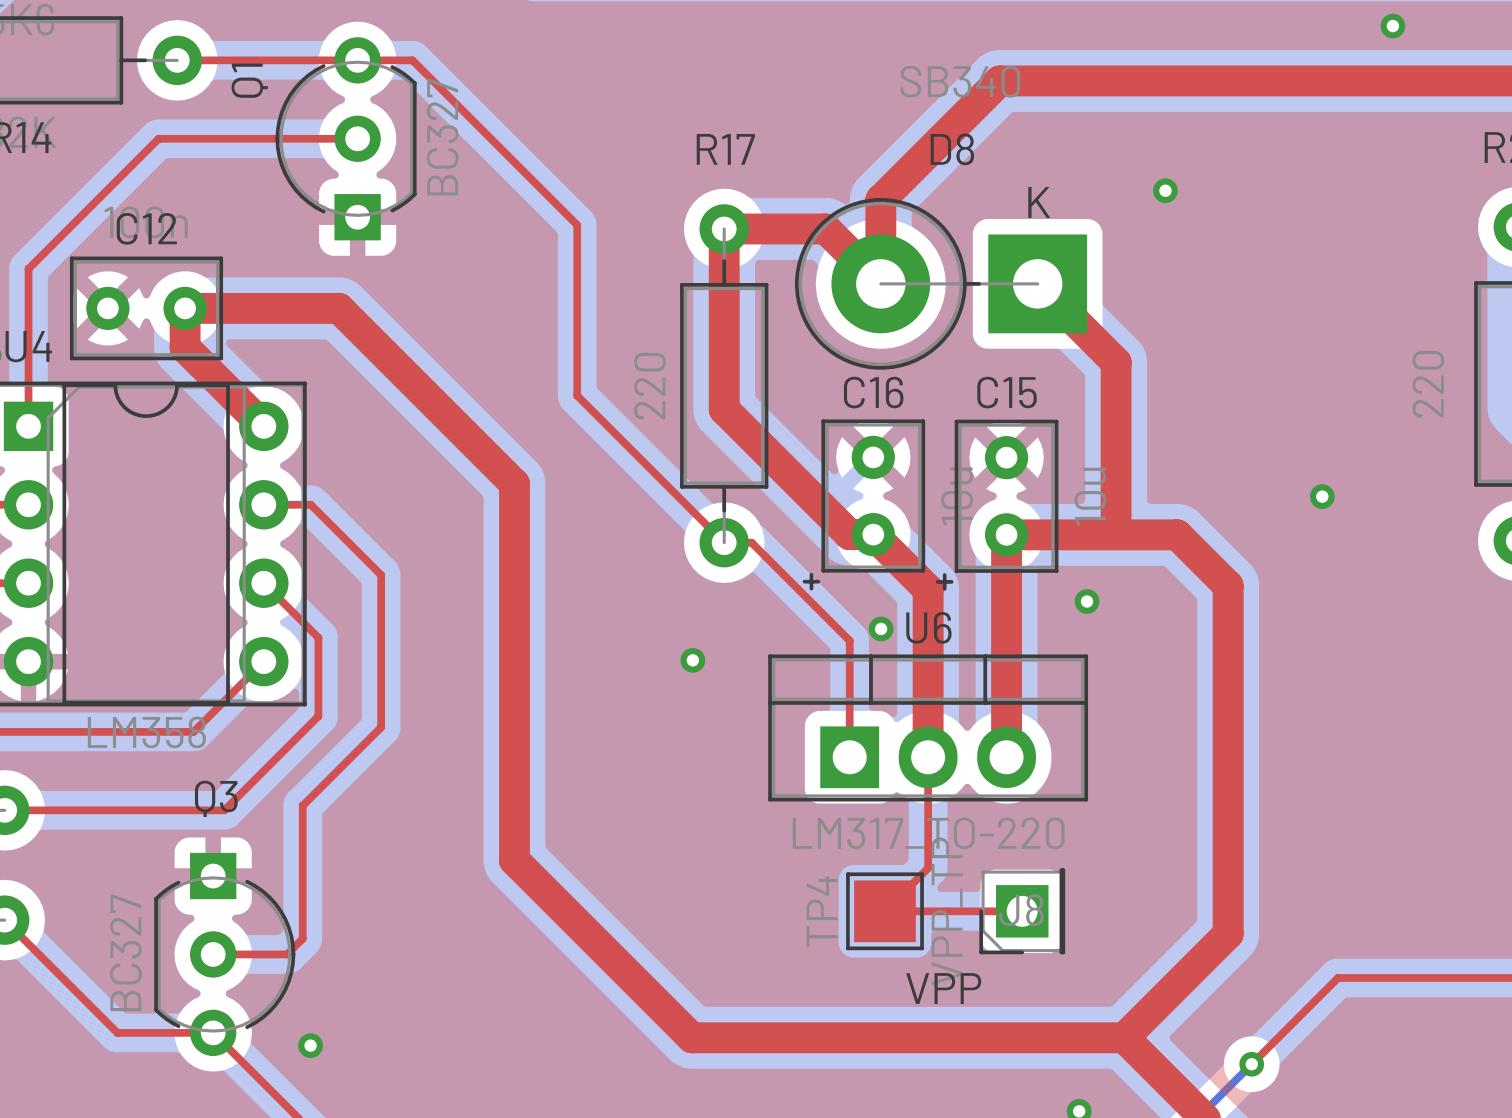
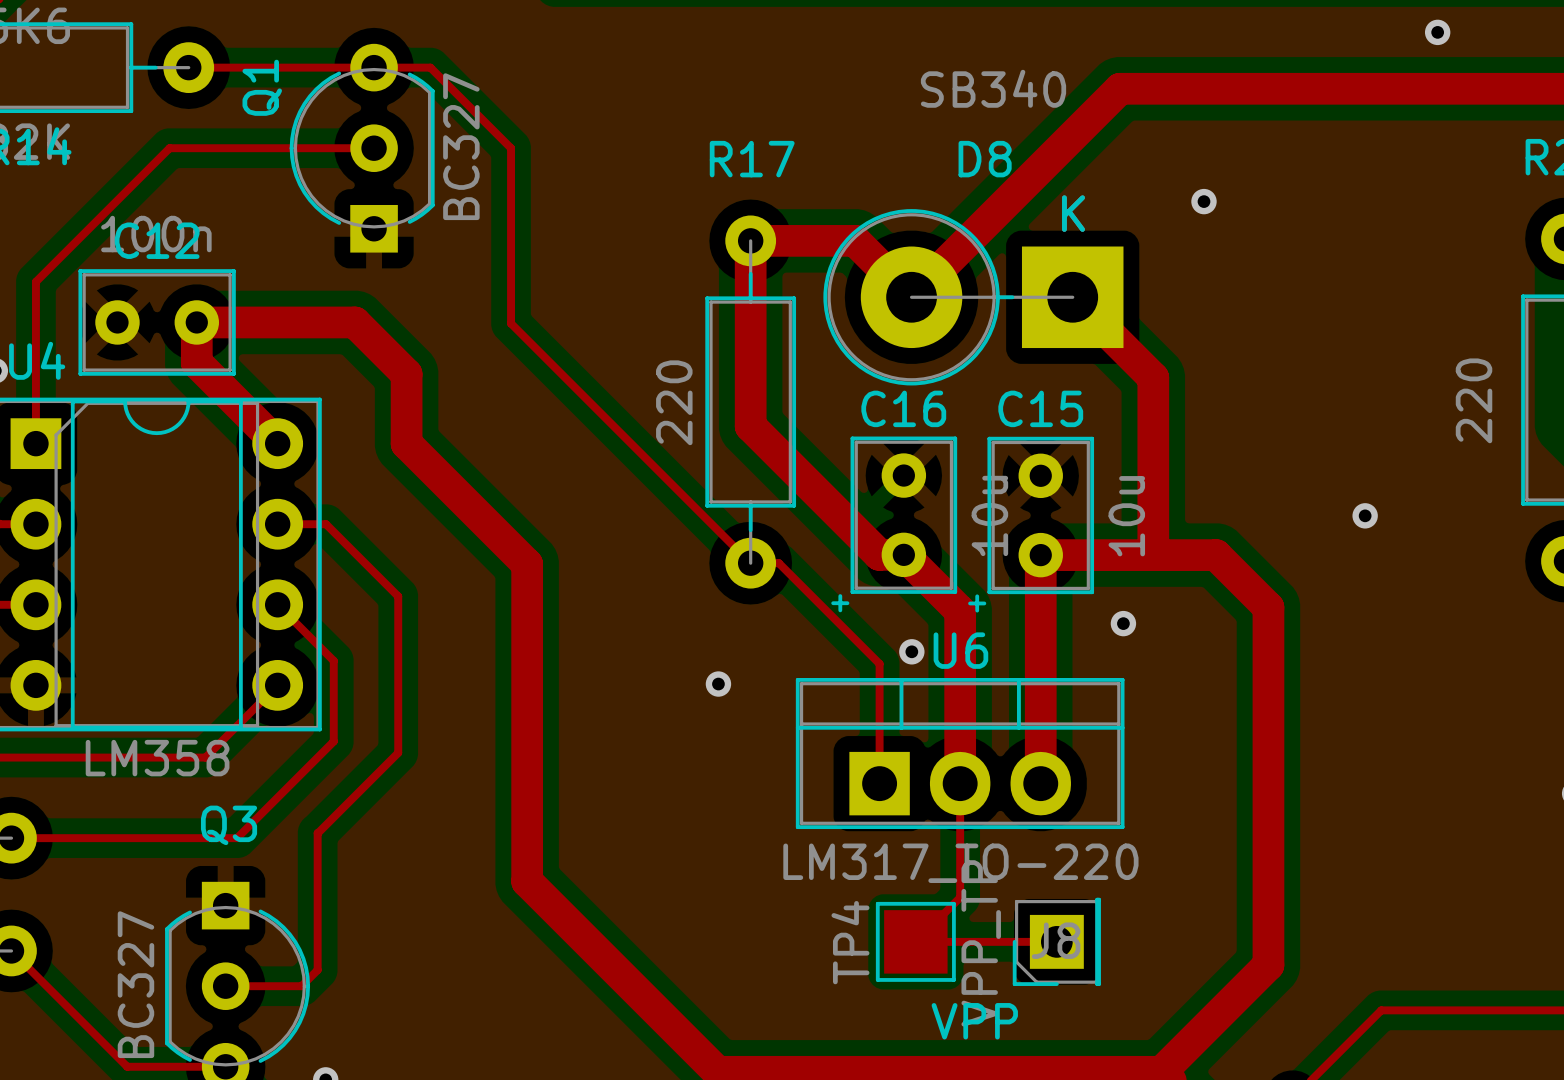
top track: (1083, 80) (999, 80) (880, 199) (880, 283) -> (1120, 88) (911, 297)
top track: (490, 138) (577, 225) (577, 395) -> (511, 148) (511, 323) (599, 412)
top track: (389, 358) (514, 483) (514, 860) -> (406, 374) (406, 443) (527, 564) (527, 881) (535, 889)

